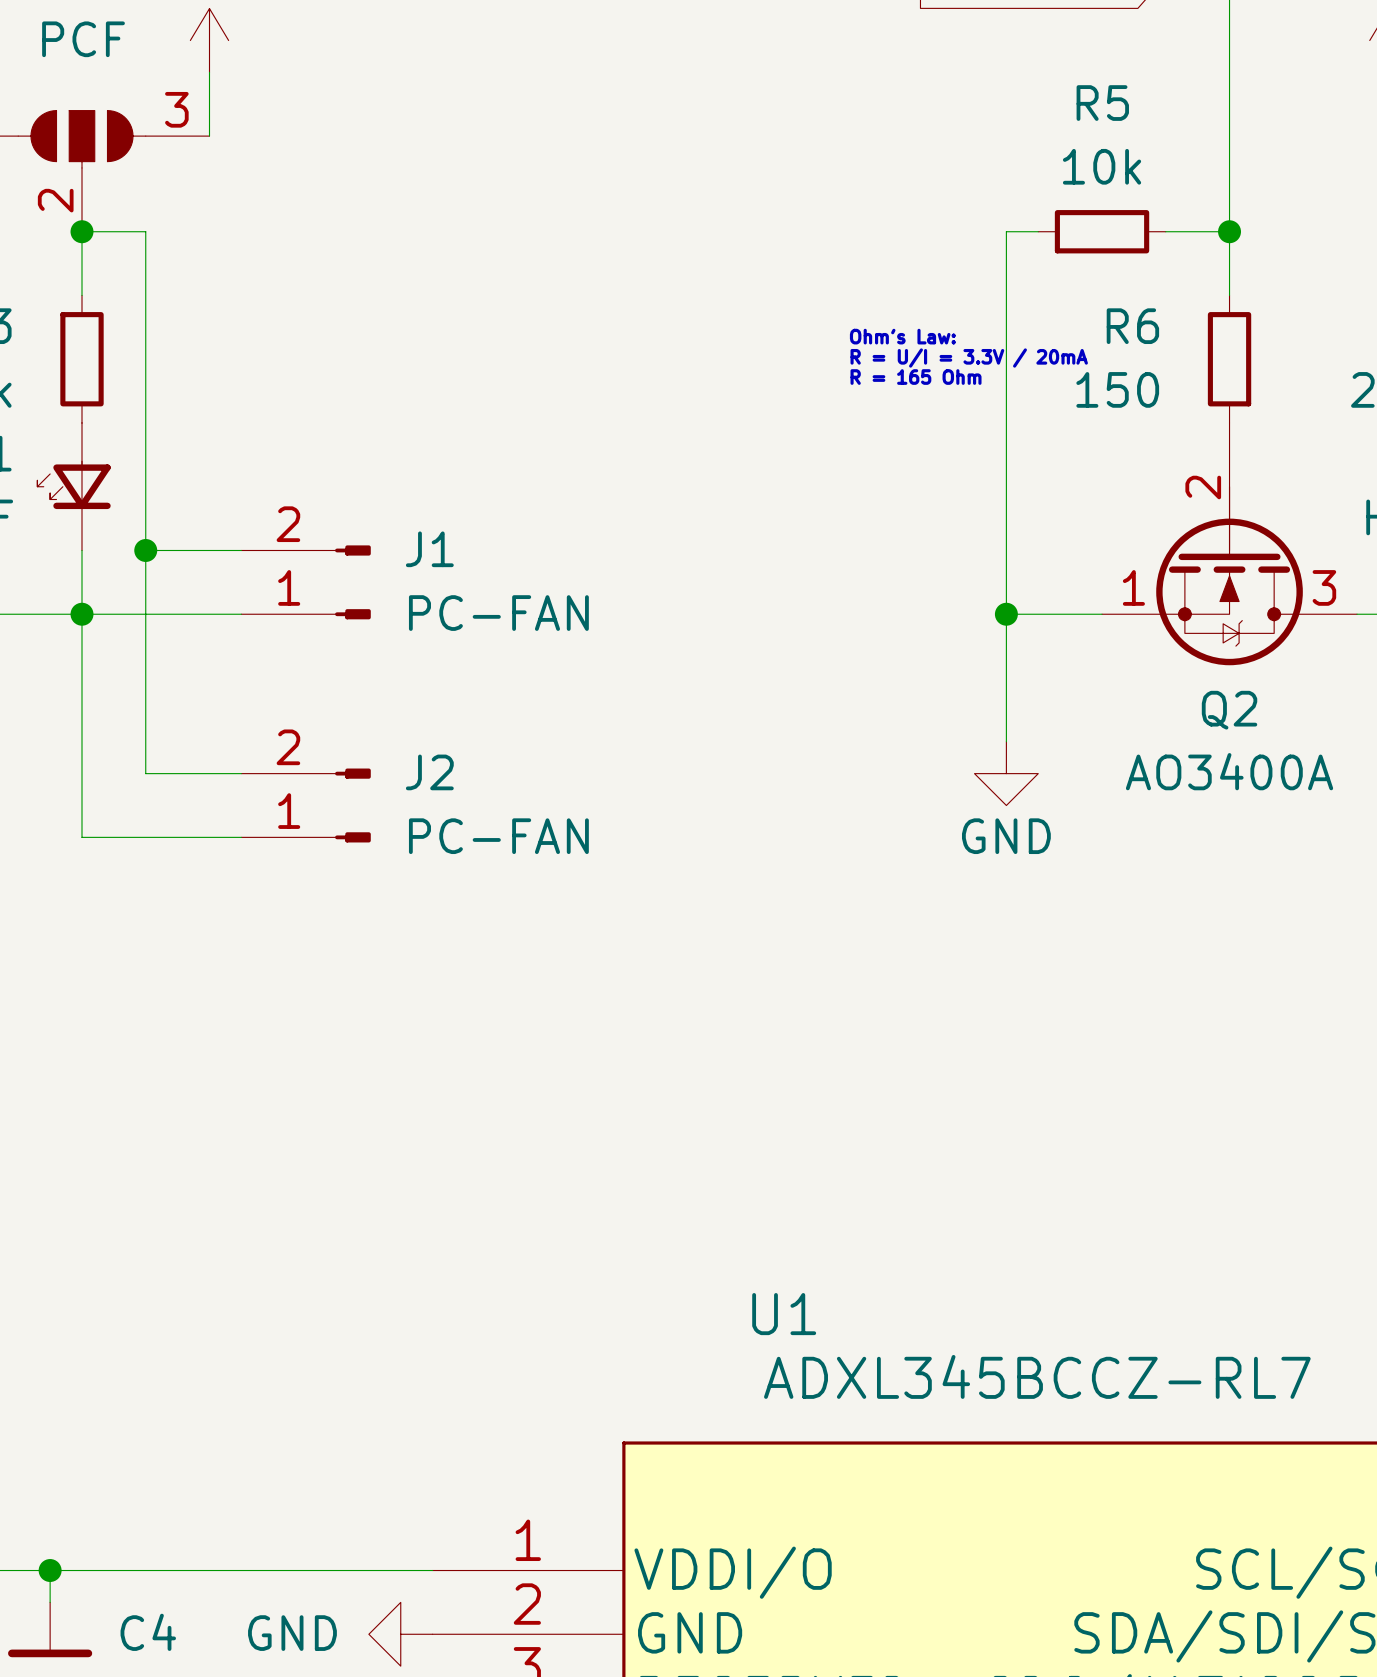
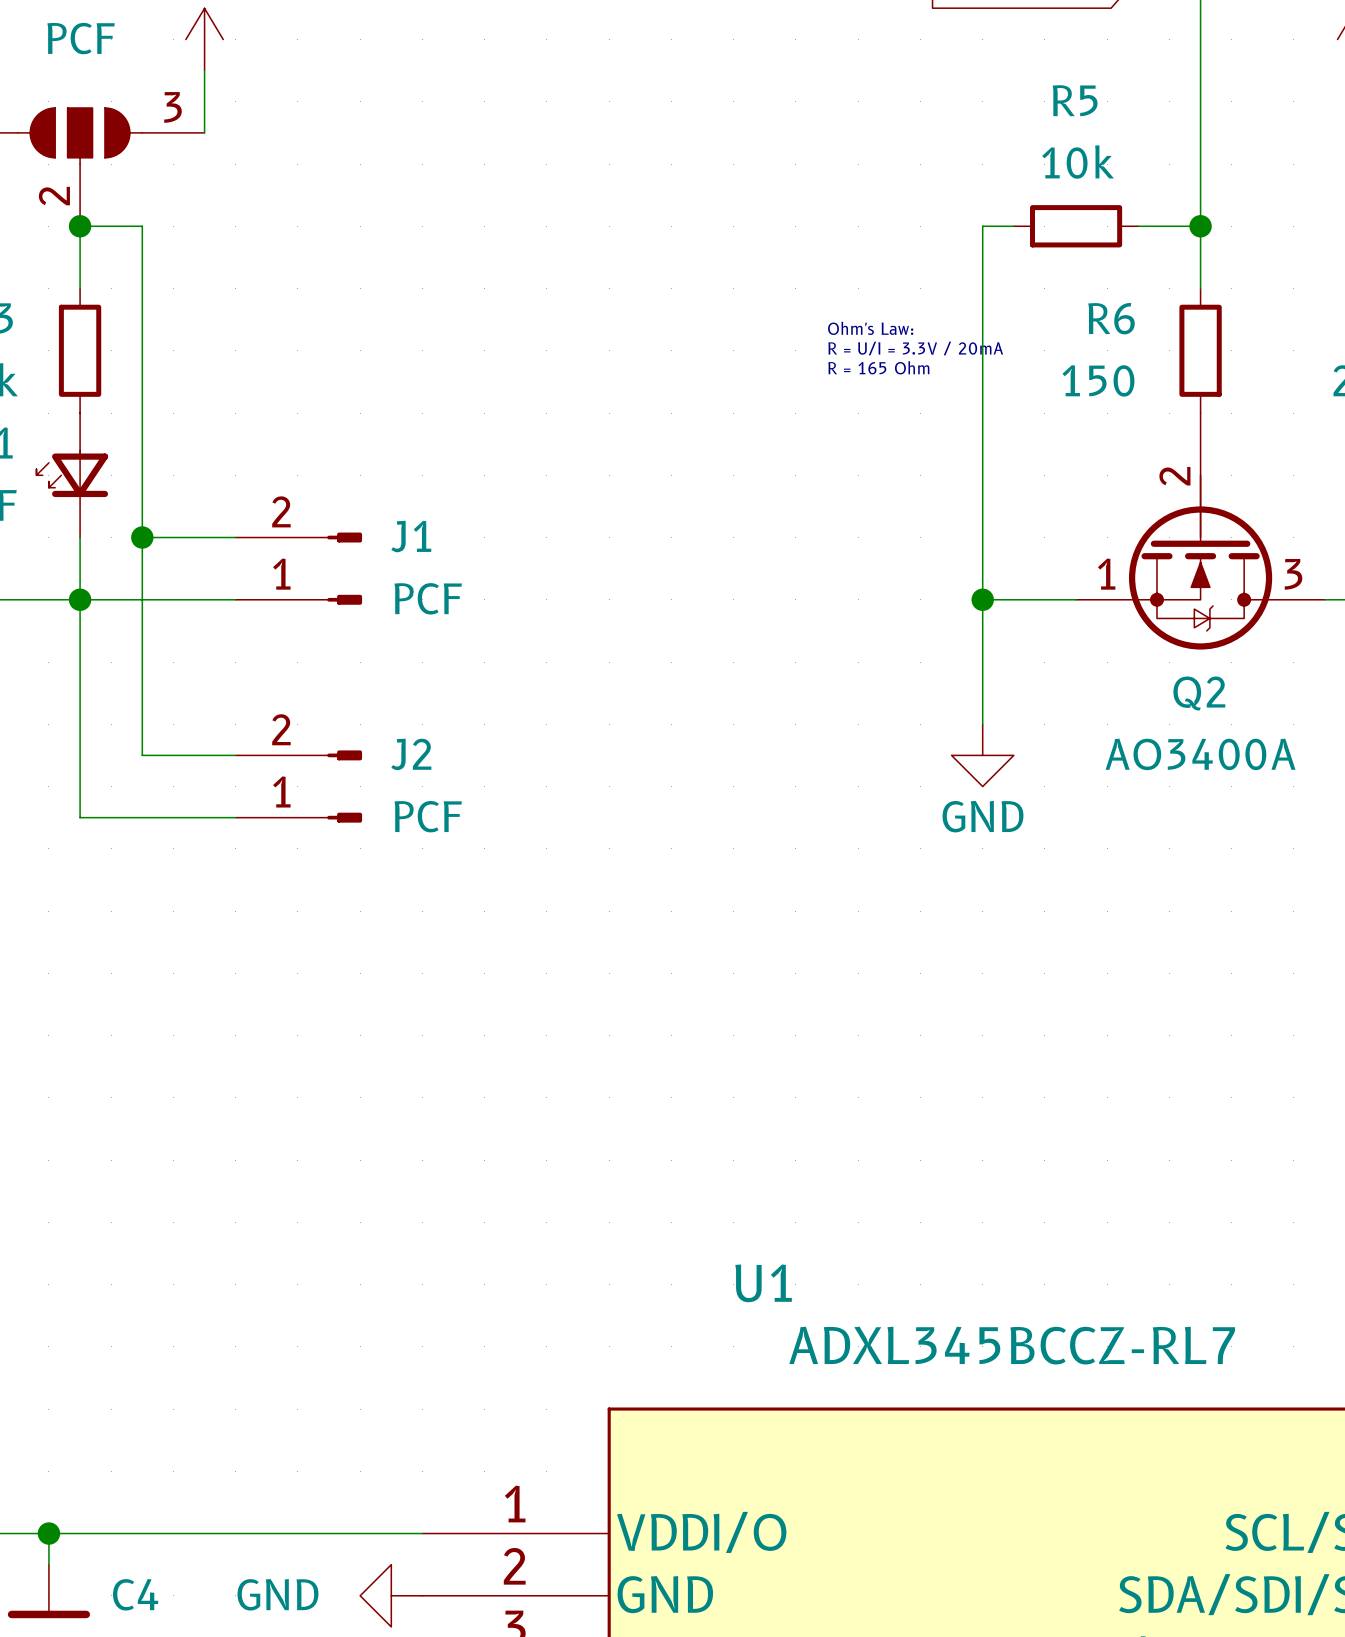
J1 value: PC-FAN (498, 613) -> PCF (428, 598)
J2 value: PC-FAN (498, 836) -> PCF (428, 816)

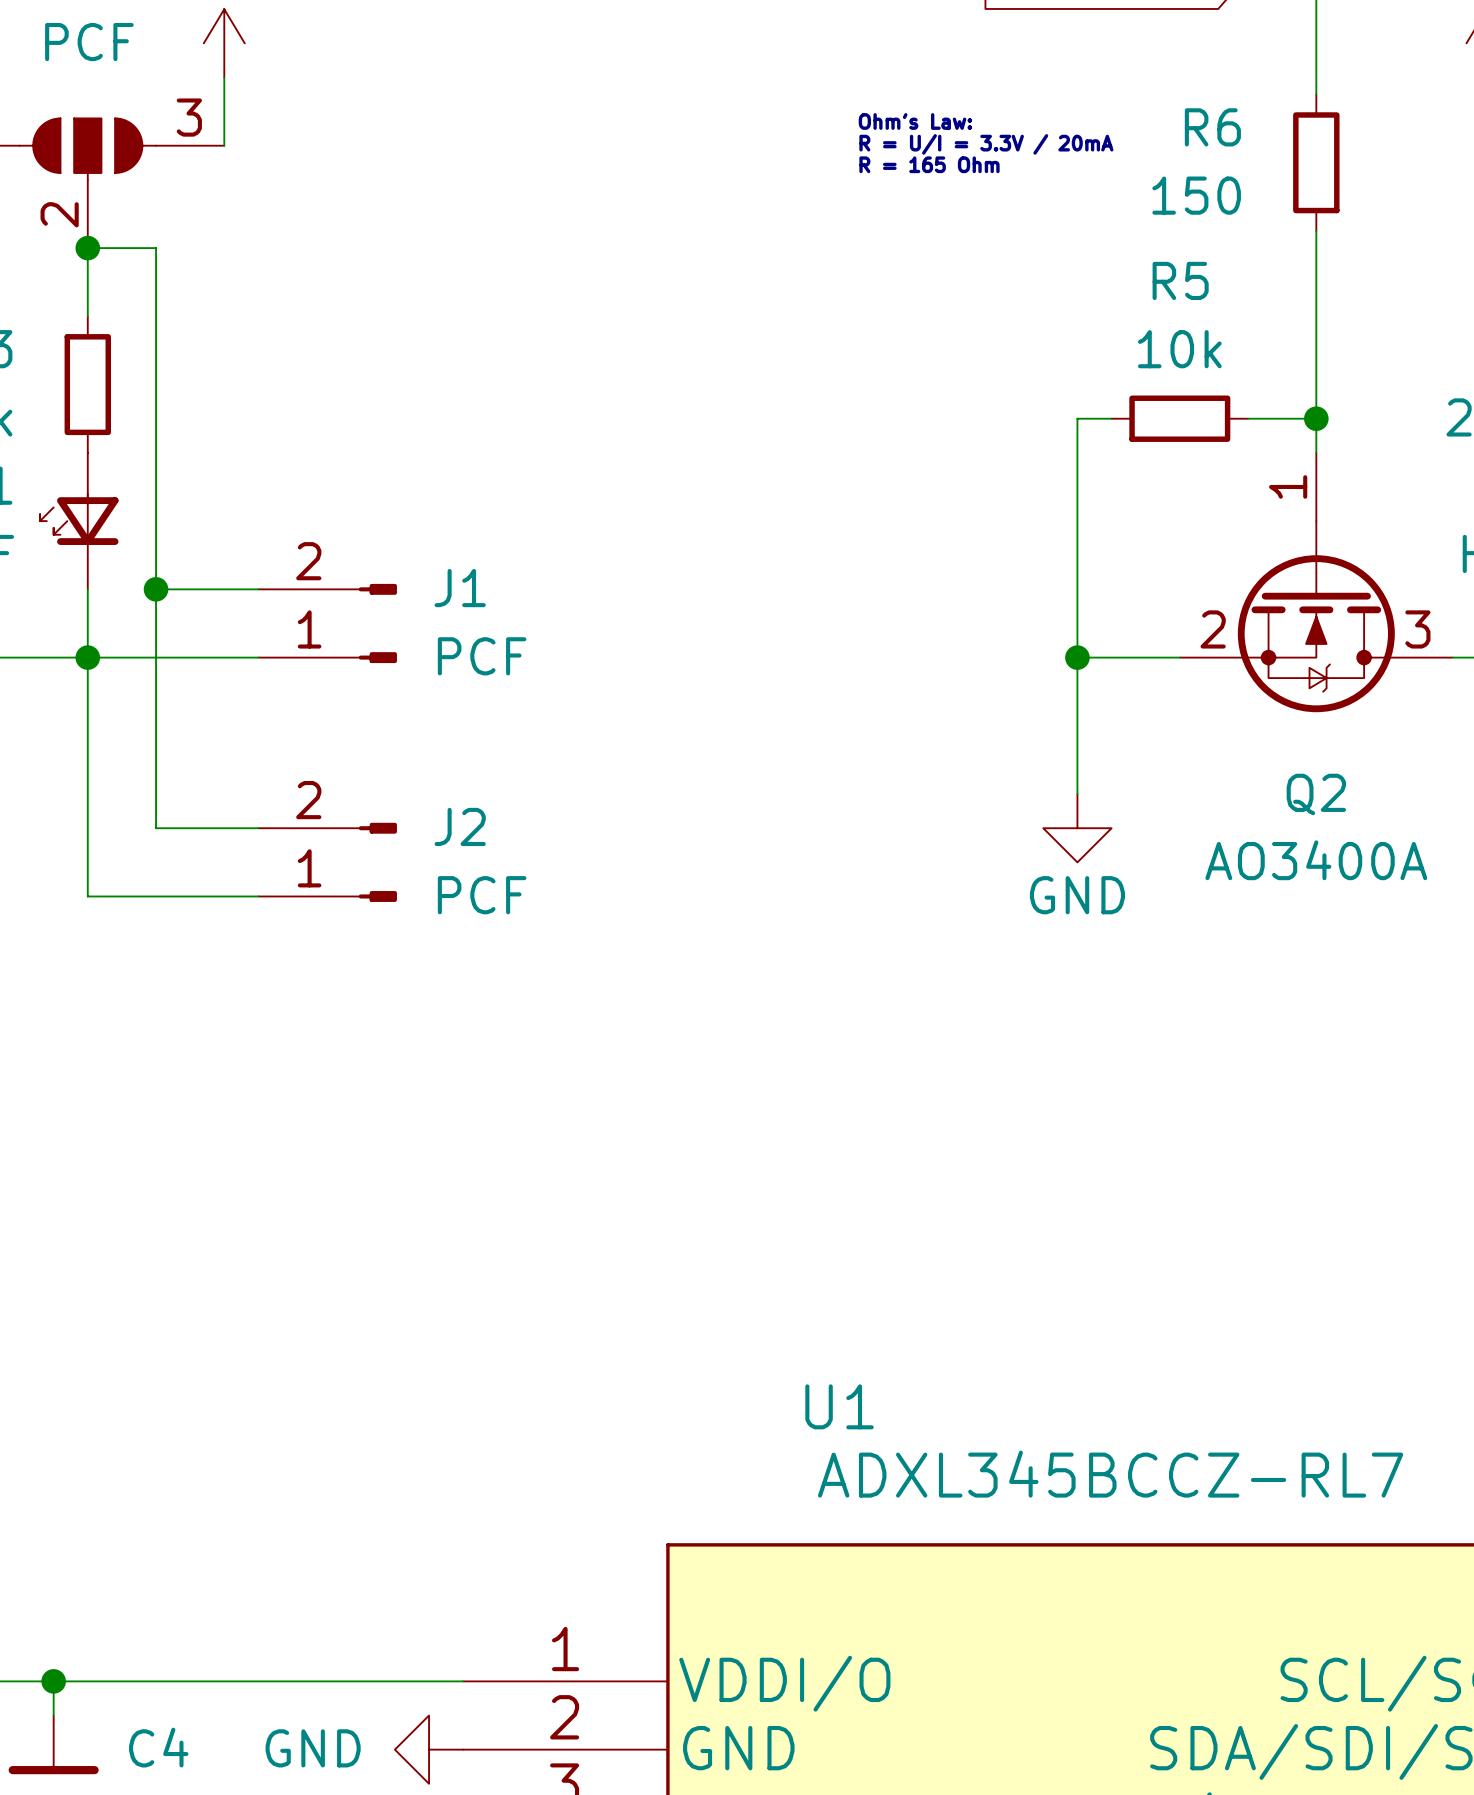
wire: (1200, 86) (1200, 210) -> (1316, 316) (1316, 452)
wire: (1013, 226) (982, 226) (982, 381) -> (1111, 418) (1077, 418)
R5 position: (1076, 226) -> (1179, 418)
wire: (1138, 226) (1200, 226) -> (1248, 418) (1316, 418)
junction: (1200, 226) -> none
text position: Ohm's Law: (870, 328) -> Ohm's Law: (915, 121)
text position: R = U/I = 3.3V / 20mA (915, 348) -> R = U/I = 3.3V / 20mA (986, 144)
R6 position: (1200, 350) -> (1316, 162)
text position: R = 165 Ohm (878, 367) -> R = 165 Ohm (929, 164)
junction: none -> (1316, 418)
Q2 symbol: [1076, 413, 1326, 650] -> [1179, 452, 1453, 713]

